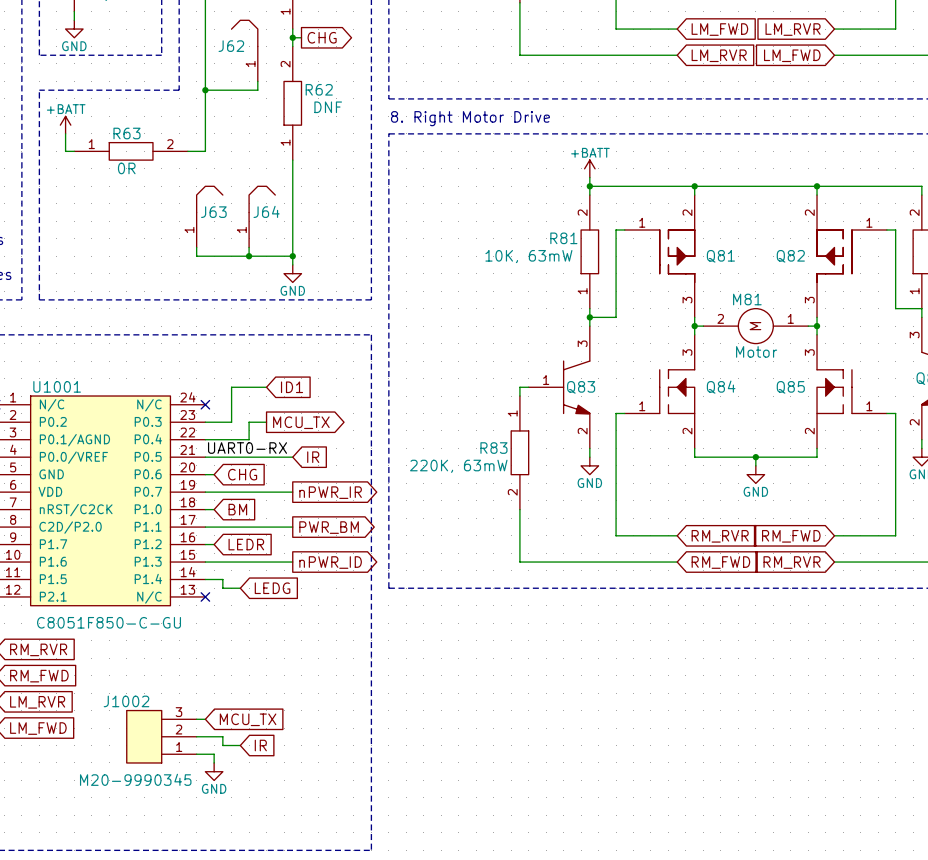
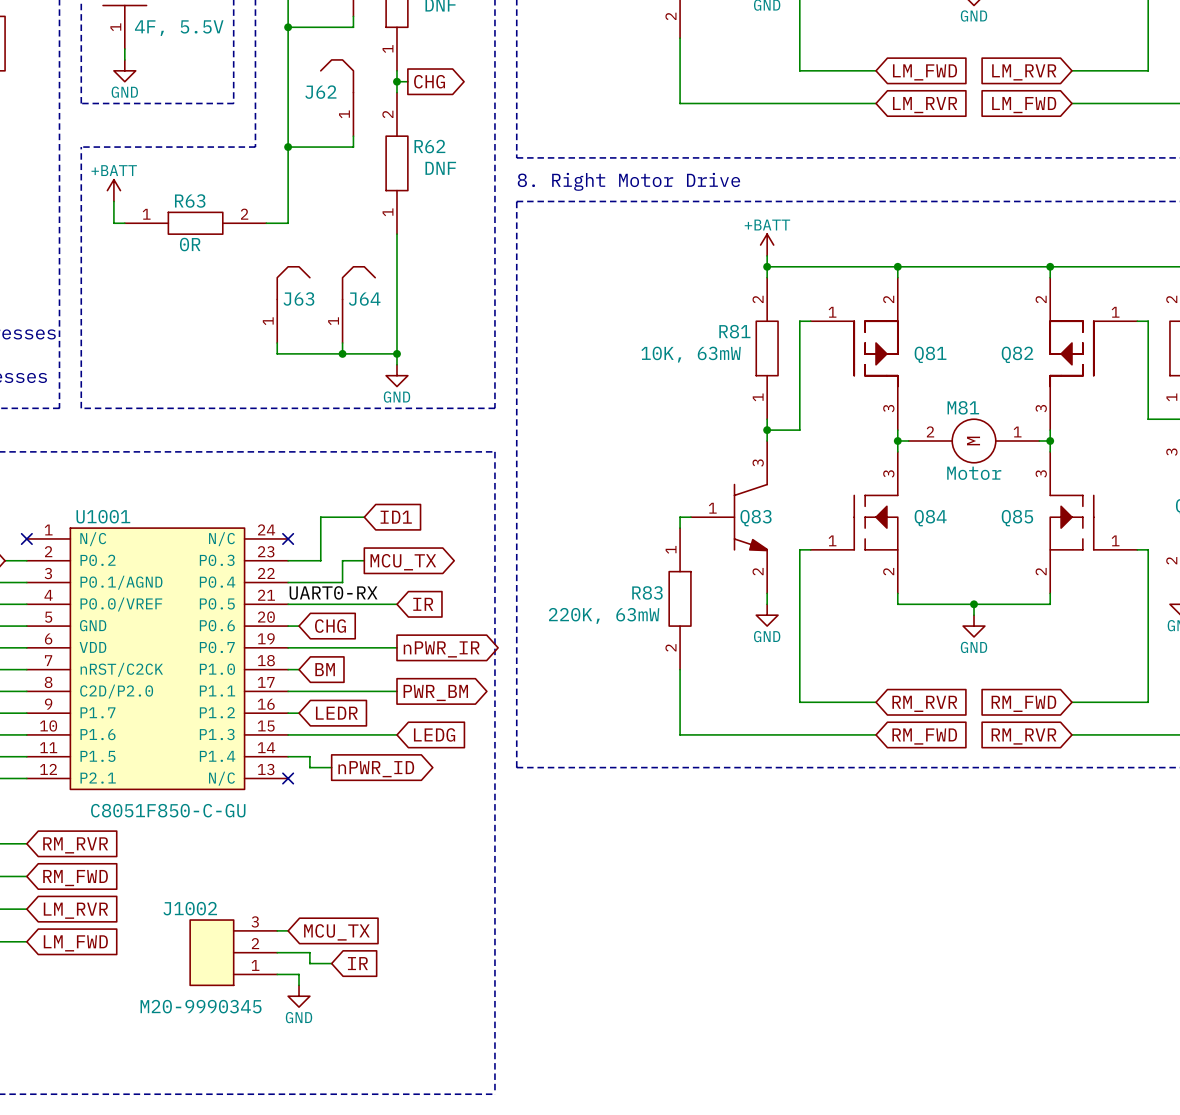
global label shape: output (330, 562) -> input (434, 734)
global label: nPWR_ID (330, 562) -> LEDG (434, 734)
global label shape: input (272, 588) -> output (376, 769)
global label: LEDG (272, 588) -> nPWR_ID (376, 769)

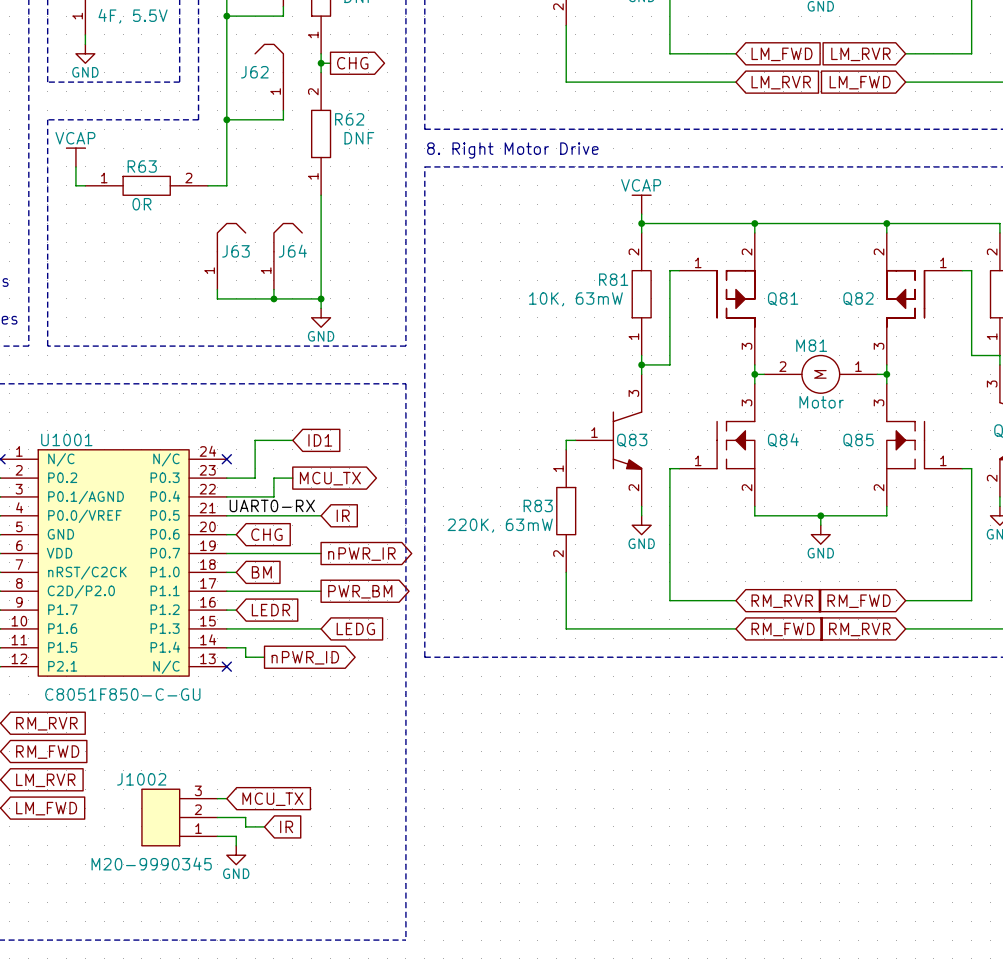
power symbol: +BATT (113, 190) -> VCAP (75, 157)
power symbol: +BATT (767, 245) -> VCAP (641, 204)

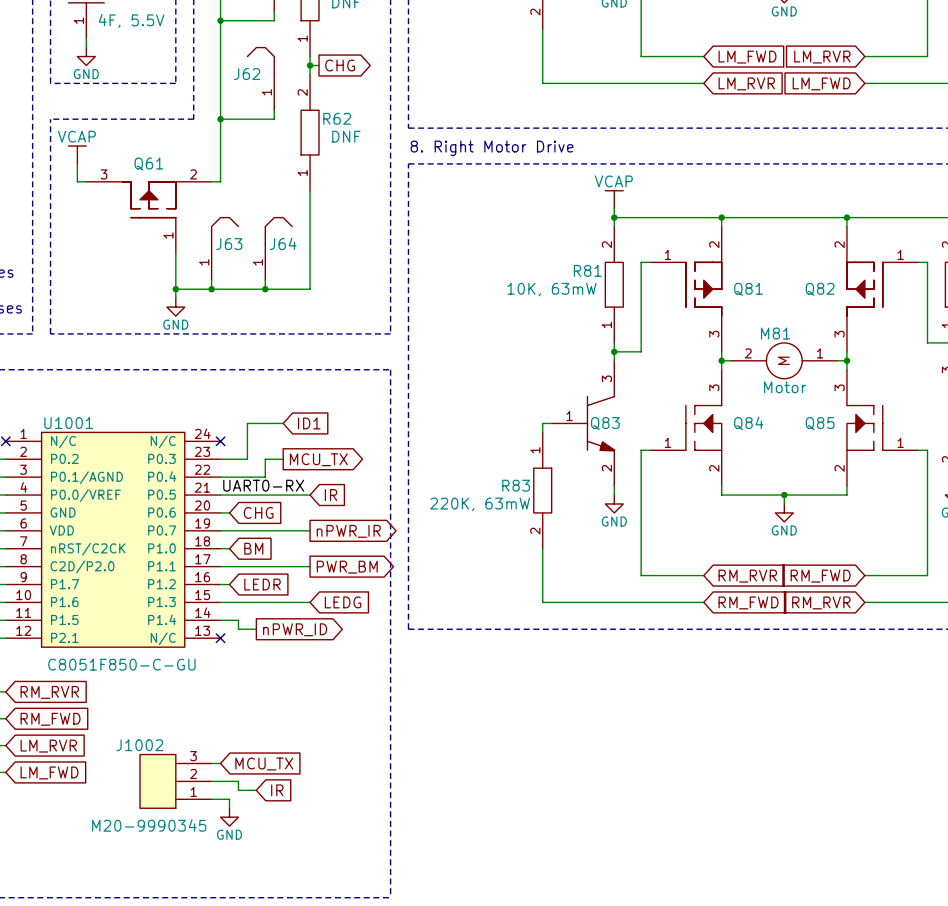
R63: 0R (146, 185) -> none
Q61: none -> (148, 217)
wire: none -> (175, 253) (175, 298)
wire: none -> (175, 289) (211, 289)
junction: none -> (175, 289)
junction: none -> (211, 289)
wire: (321, 298) (321, 308) -> none
junction: (321, 298) -> none
power symbol position: GND (321, 317) -> GND (175, 307)

